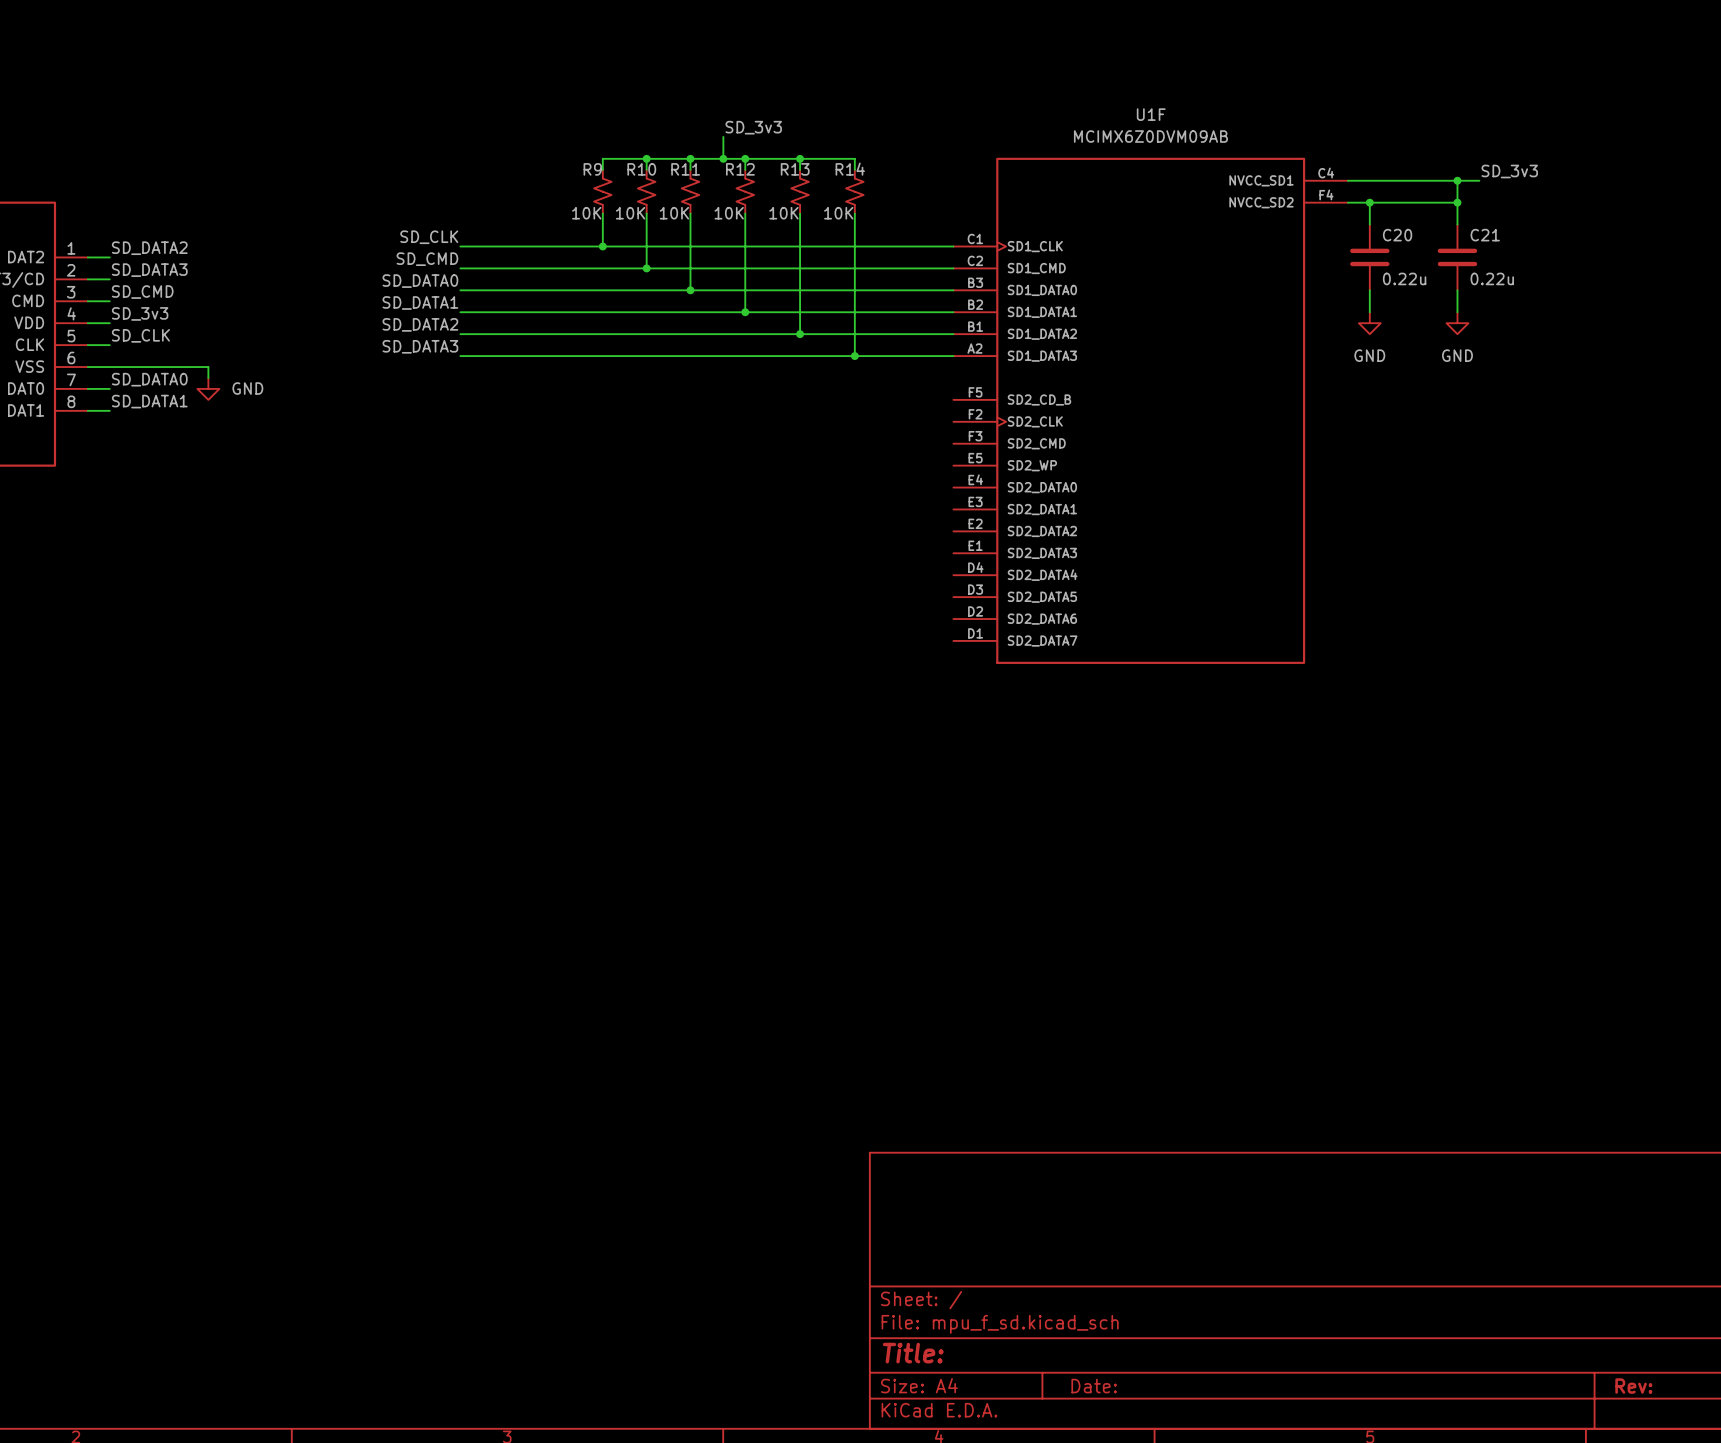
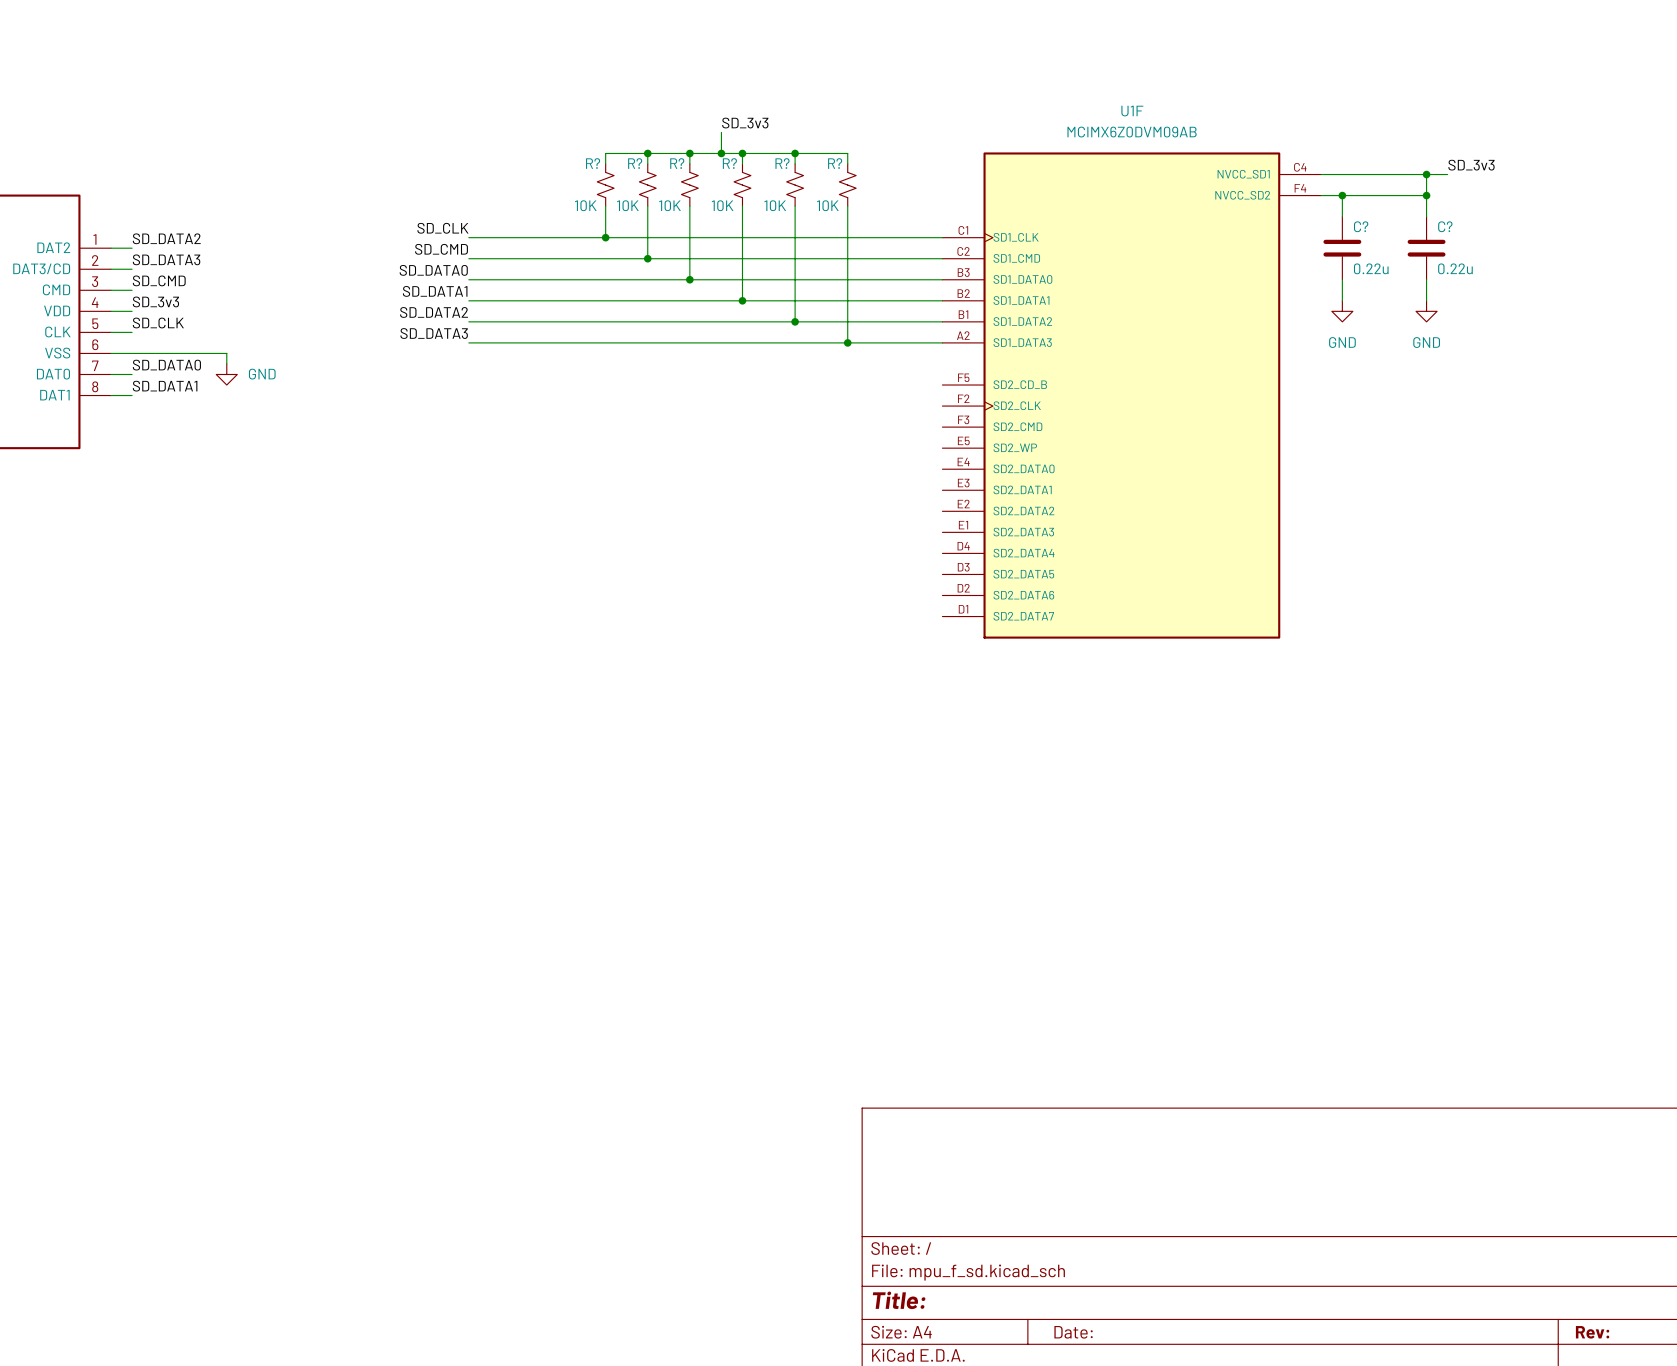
R9 name: R9 (592, 169) -> R? (593, 163)
R10 name: R10 (641, 169) -> R? (635, 163)
R11 name: R11 (685, 169) -> R? (677, 163)
R12 name: R12 (740, 169) -> R? (729, 163)
R13 name: R13 (795, 169) -> R? (782, 163)
R14 name: R14 (850, 169) -> R? (835, 163)
C20 name: C20 (1397, 235) -> C? (1361, 226)
C21 name: C21 (1485, 235) -> C? (1445, 226)

